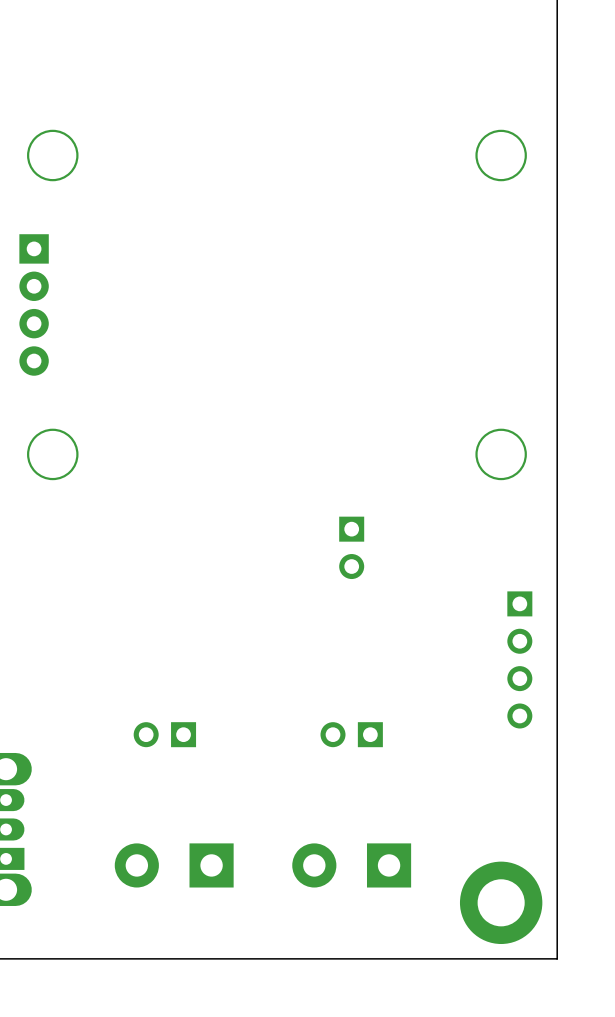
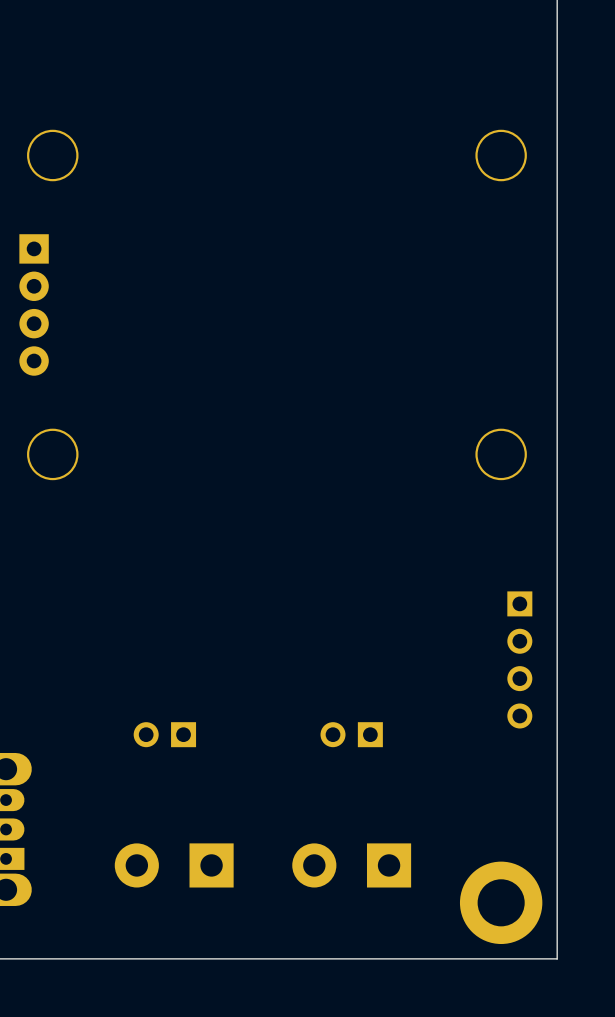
part: (351, 547) -> none

